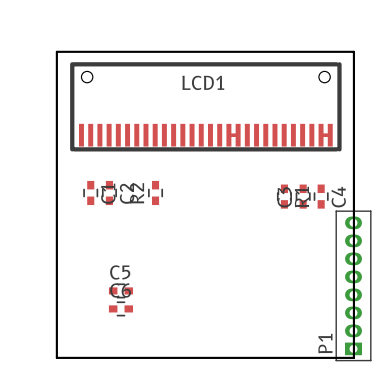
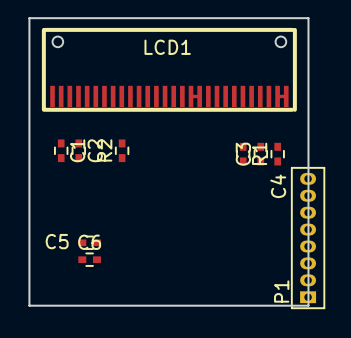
C4 name position: C4 (338, 197) -> C4 (278, 186)
C5 name position: C5 (120, 272) -> C5 (57, 241)

